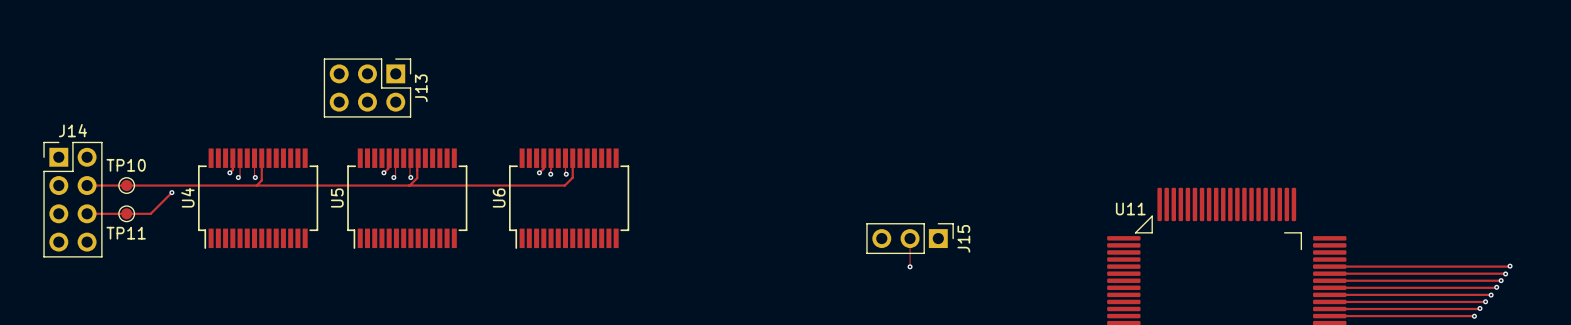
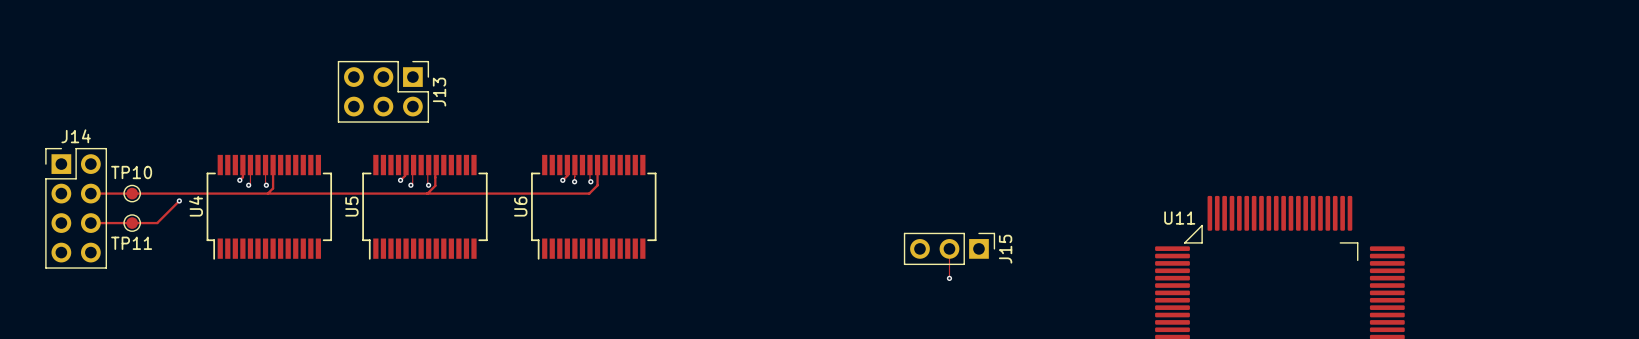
track: (1510, 266) (1329, 266) -> none
via: (1510, 266) -> none
track: (1329, 273) (1505, 273) -> none
via: (1505, 273) -> none
track: (1329, 280) (1501, 280) -> none
via: (1501, 280) -> none
track: (1496, 287) (1329, 287) -> none
via: (1496, 287) -> none
track: (1329, 294) (1491, 295) -> none
via: (1491, 295) -> none
track: (1485, 301) (1329, 301) -> none
via: (1485, 301) -> none
track: (1480, 308) (1329, 309) -> none
via: (1480, 308) -> none
track: (1329, 316) (1474, 316) -> none
via: (1474, 316) -> none

